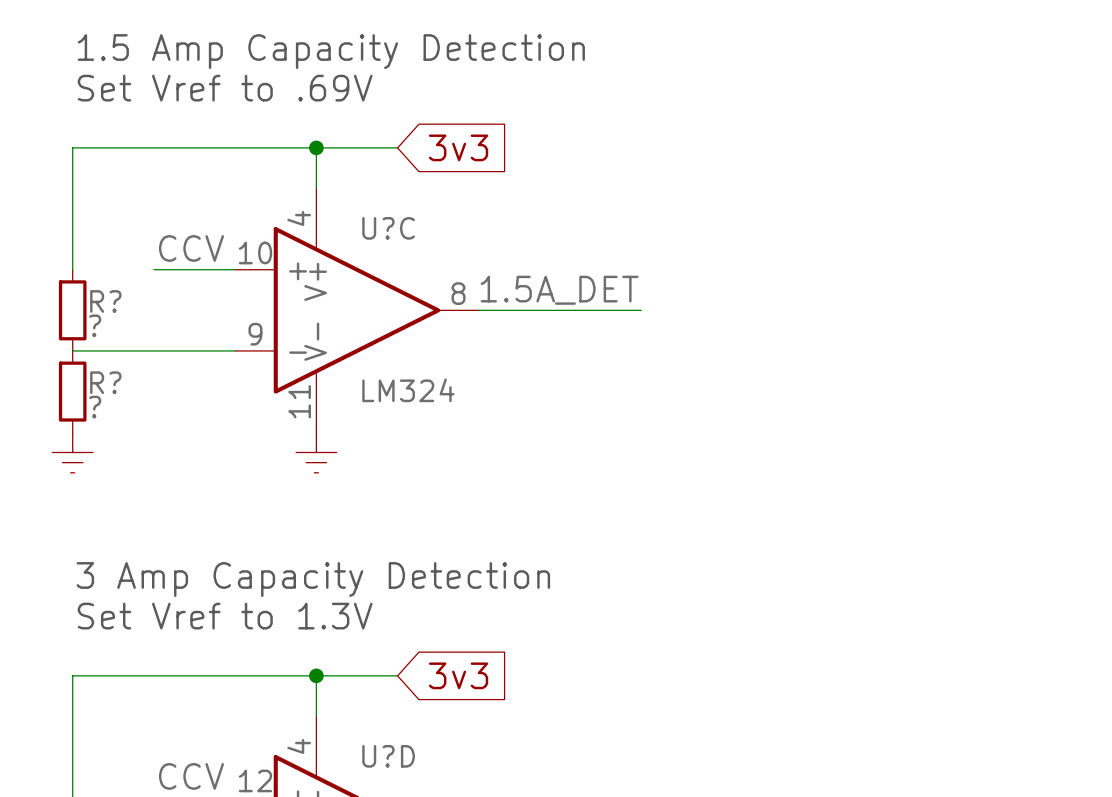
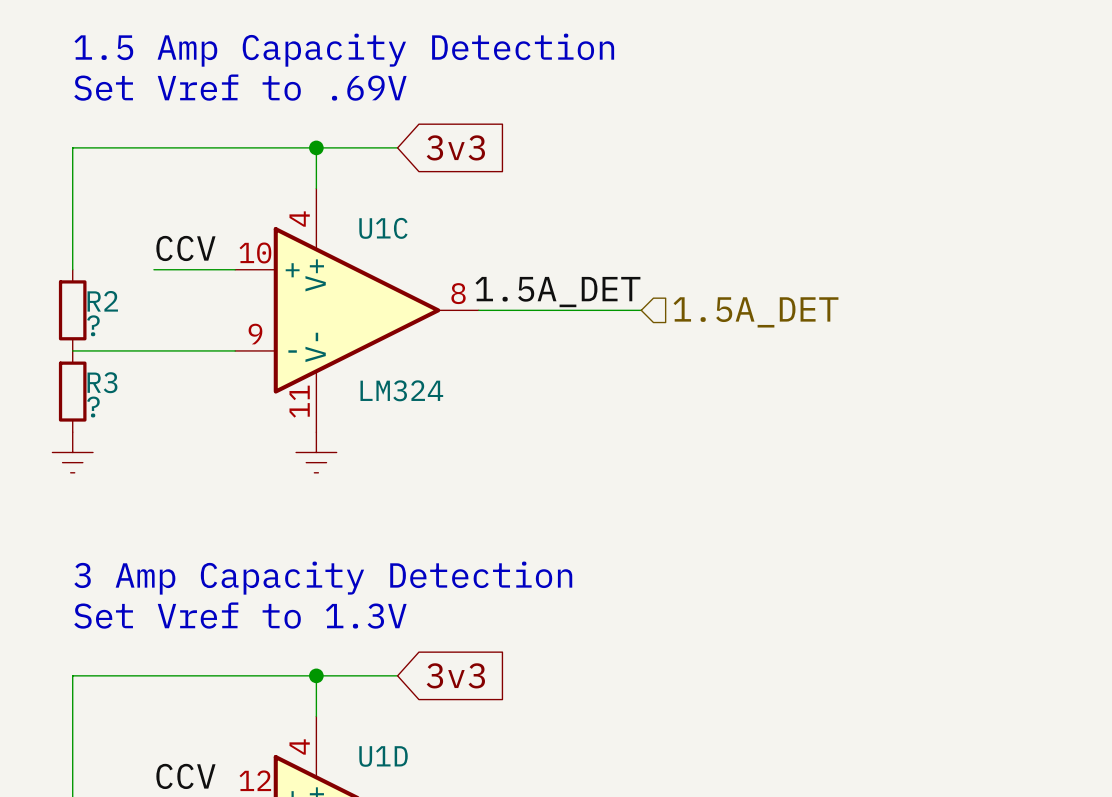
U?C name: U?C (388, 228) -> U1C (383, 228)
R? name: R? (105, 301) -> R2 (102, 301)
hierarchical label: none -> 1.5A_DET (756, 312)
R? name: R? (105, 382) -> R3 (102, 382)
U?D name: U?D (388, 756) -> U1D (383, 756)

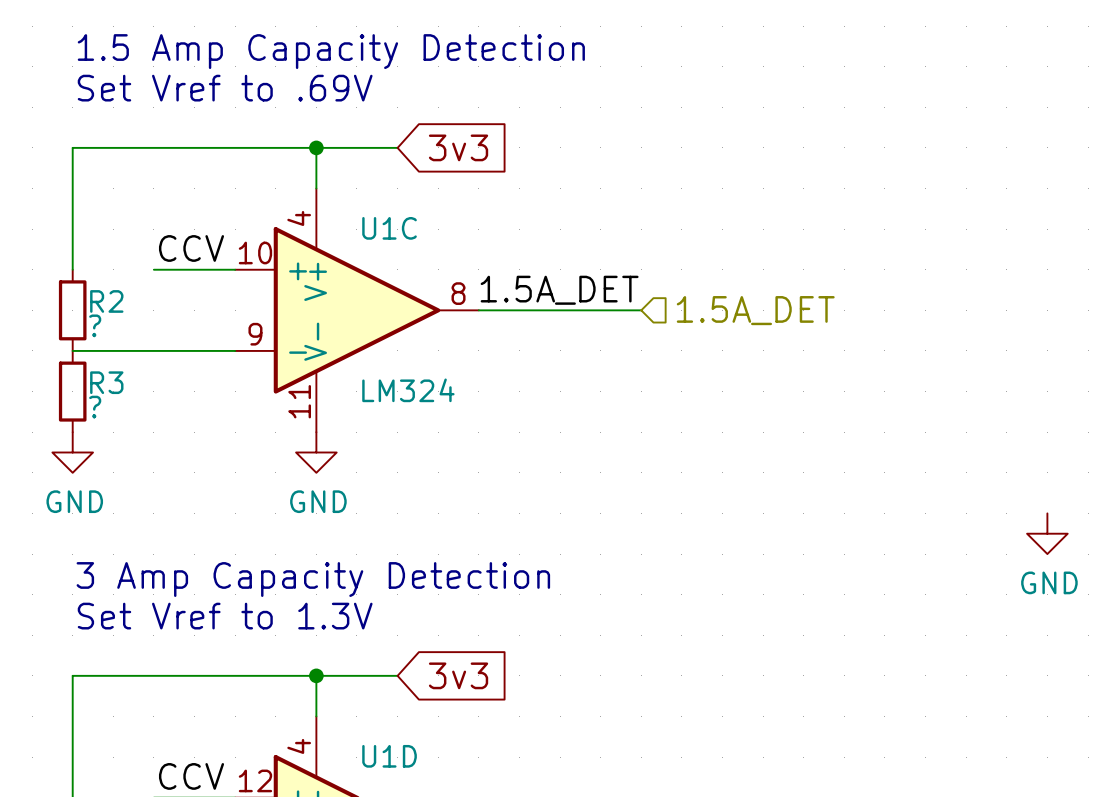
power symbol shape: [52, 432, 94, 473] -> [52, 432, 94, 473]
power symbol shape: [296, 432, 337, 473] -> [296, 432, 337, 473]
power symbol text: none -> GND (74, 501)
power symbol text: none -> GND (318, 501)
power symbol: none -> GND (1047, 533)

